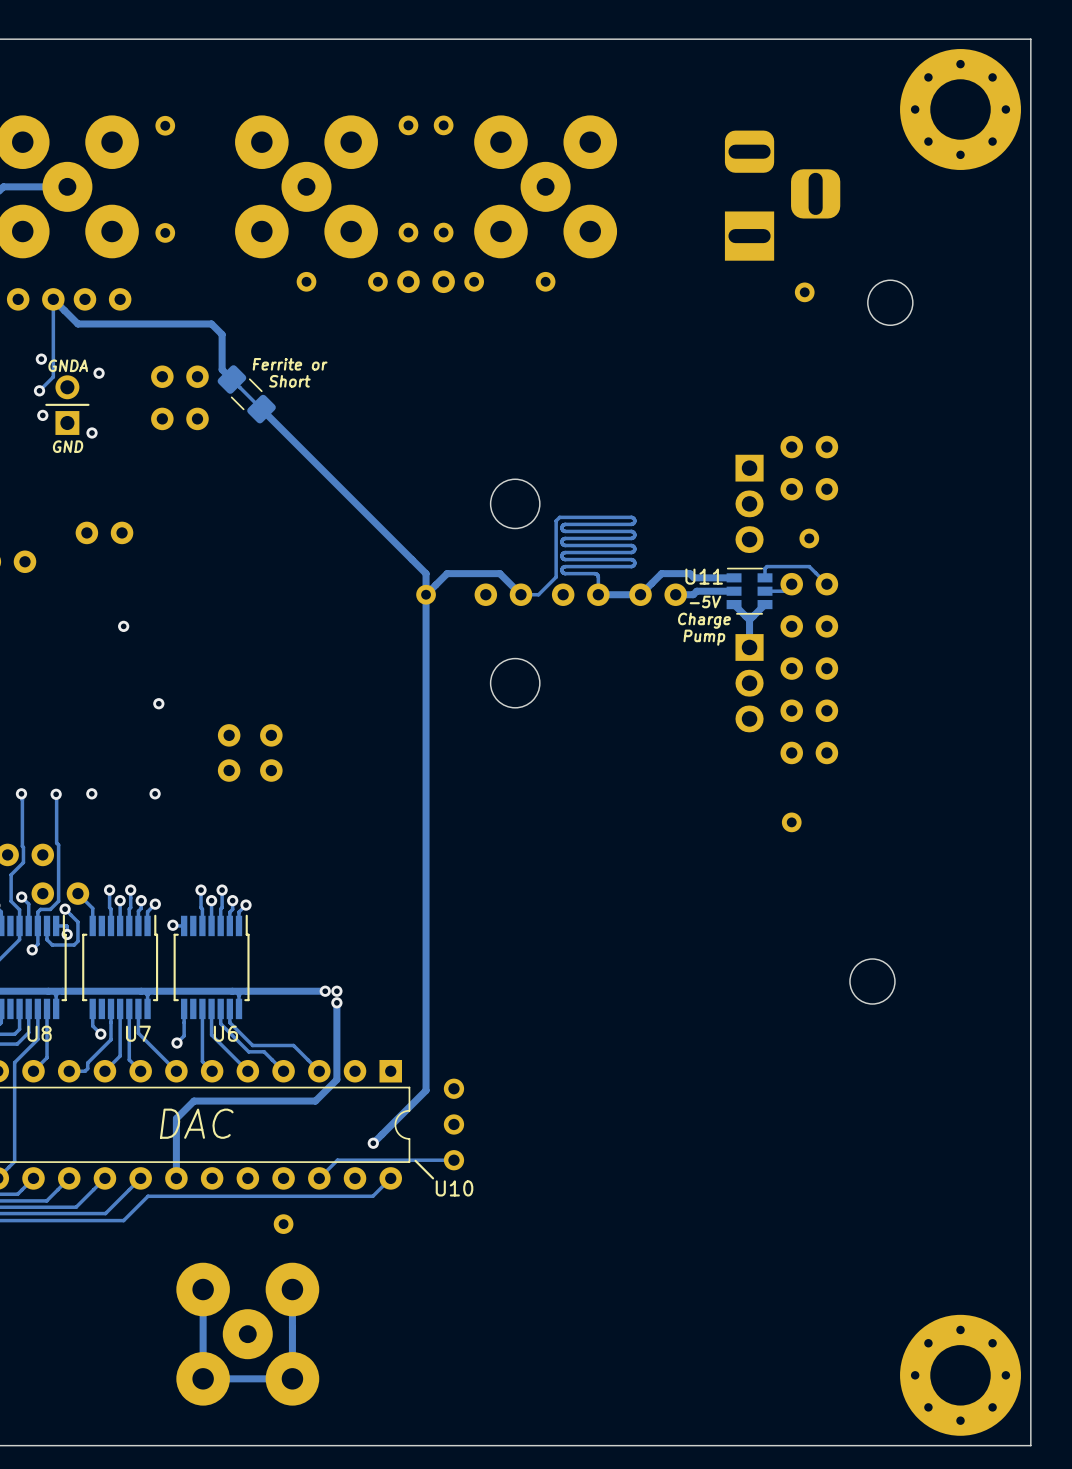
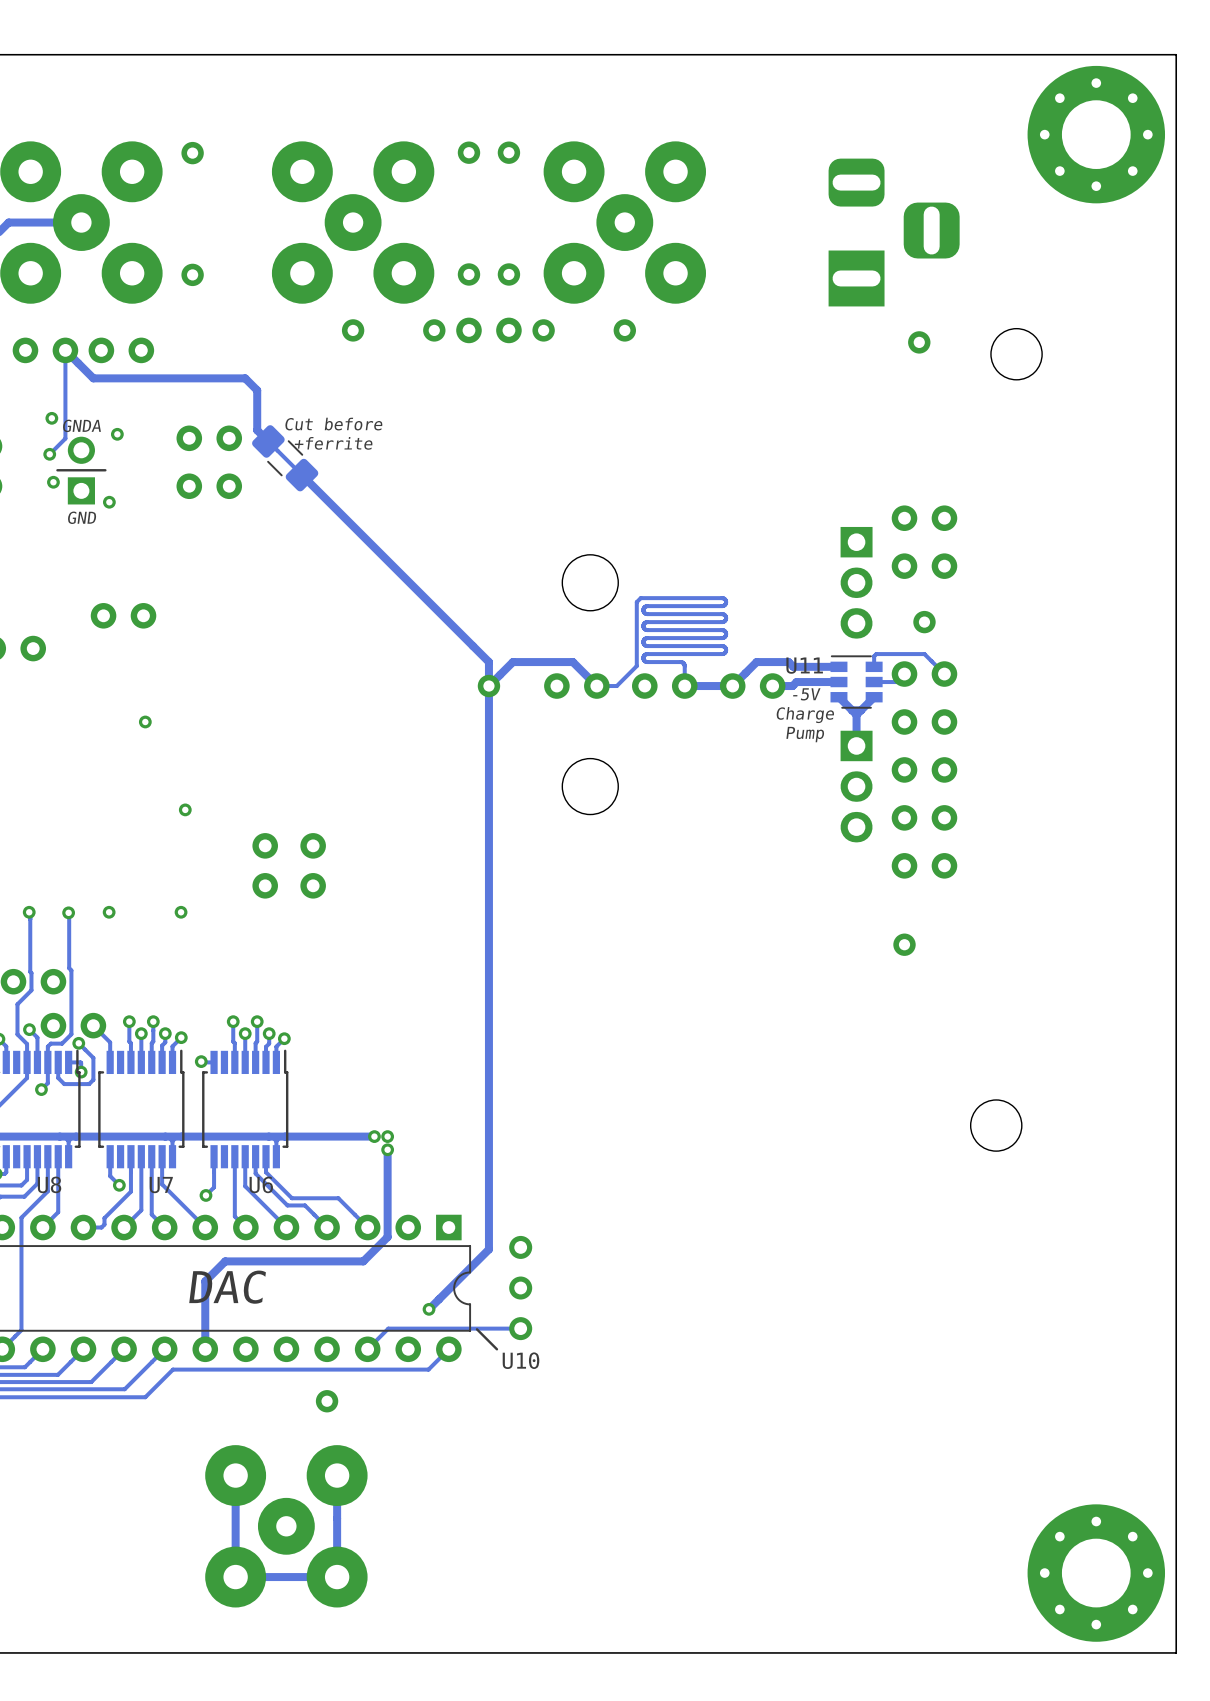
text: Ferrite or (290, 364) -> Cut before (333, 424)
text: Short (289, 381) -> +ferrite (333, 443)

